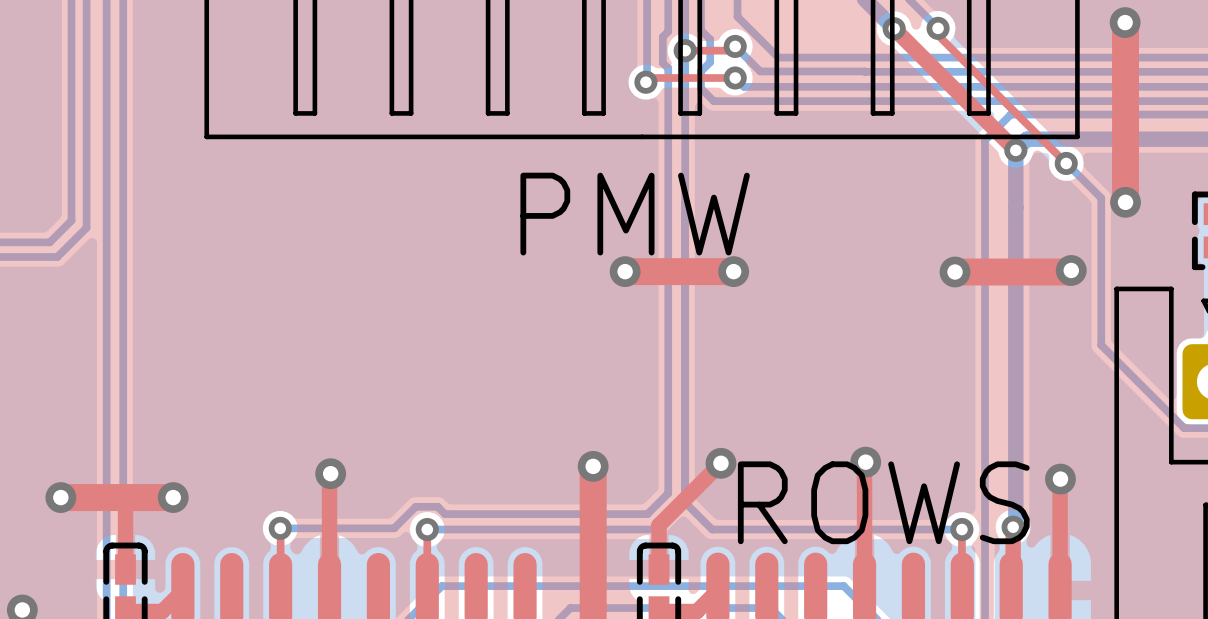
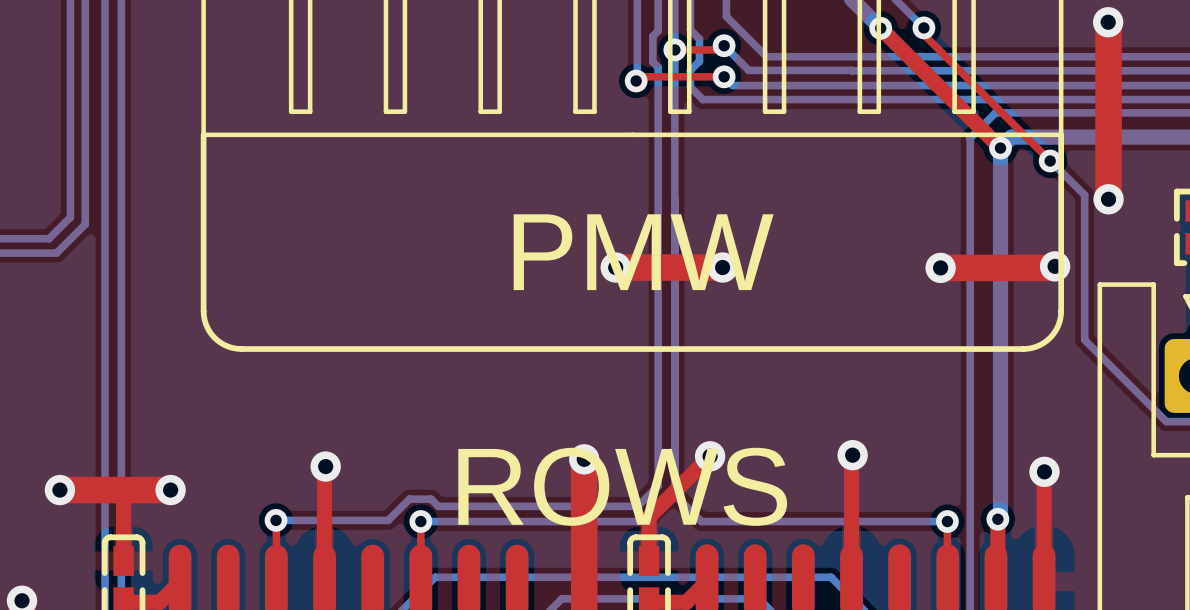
line: none -> (203, 134) (204, 319) (209, 331) (217, 340) (228, 346) (241, 349) (1031, 348) (1050, 337) (1057, 327) (1060, 315) (1061, 134)
text position: PMW (635, 214) -> PMW (643, 252)
text position: ROWS (883, 502) -> ROWS (622, 486)

